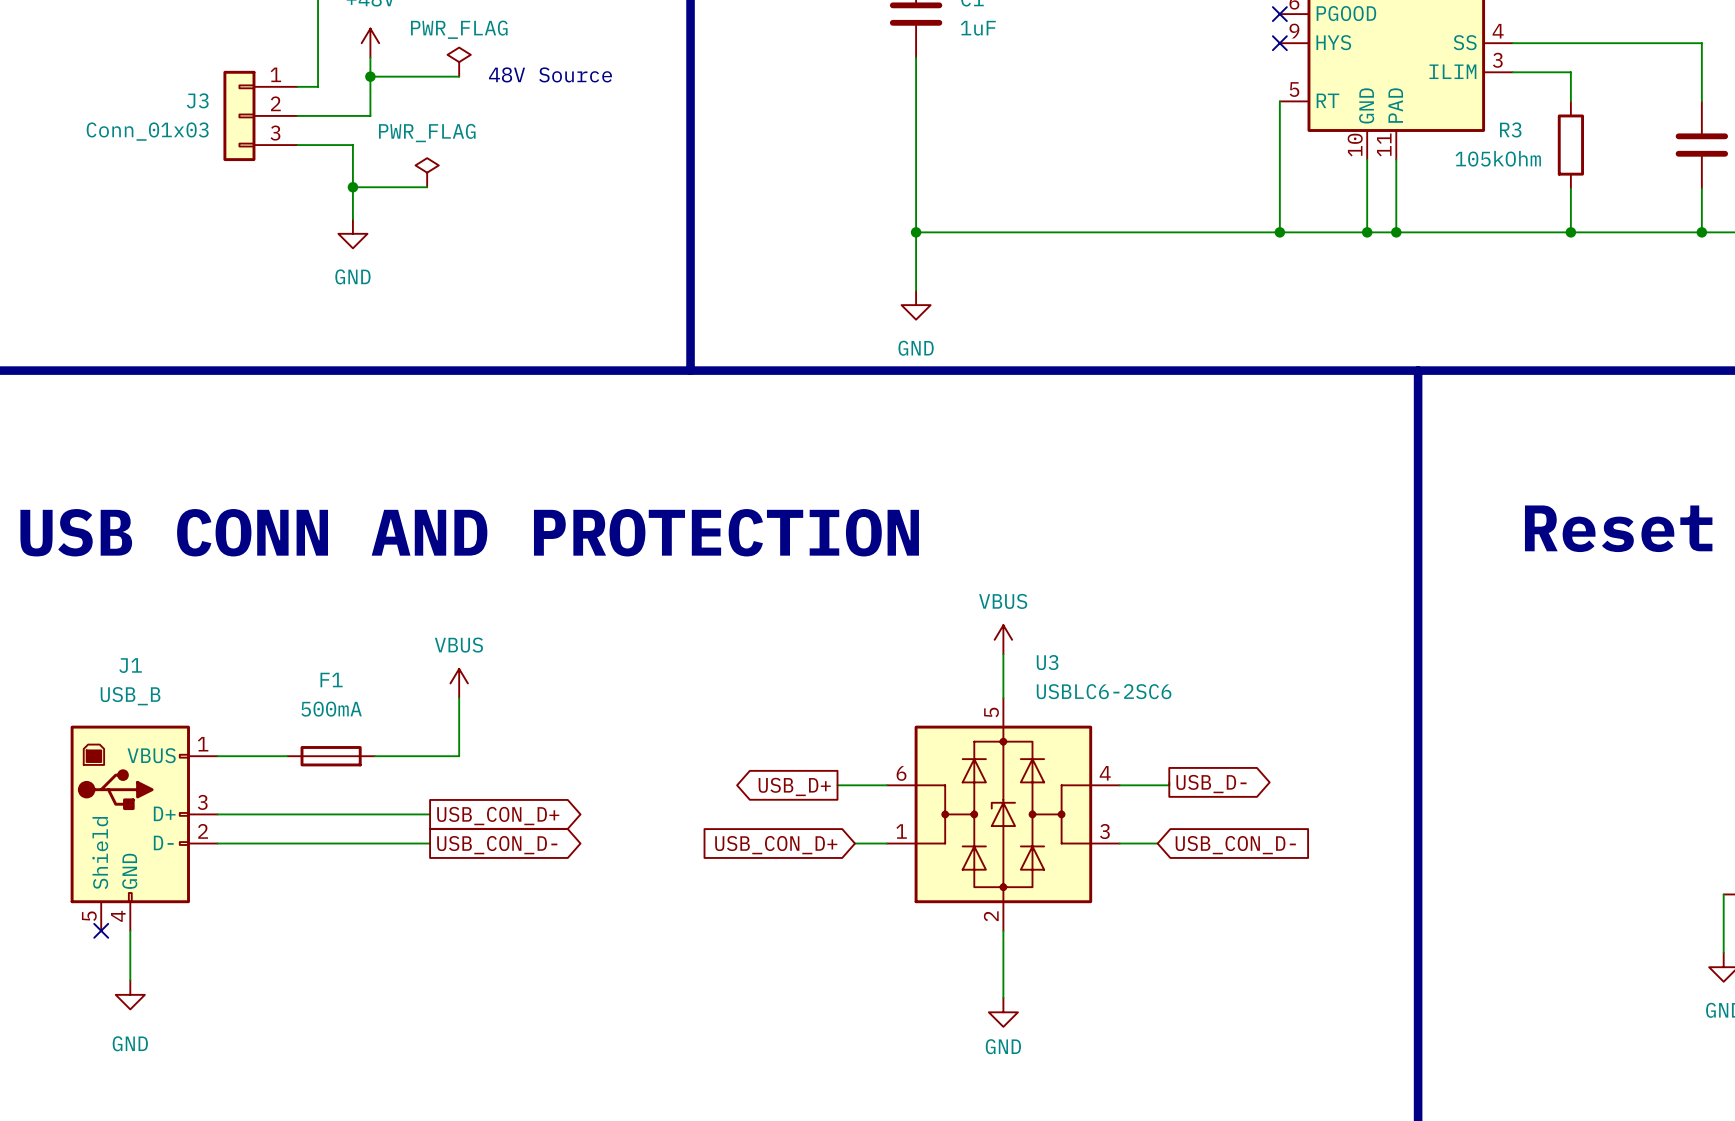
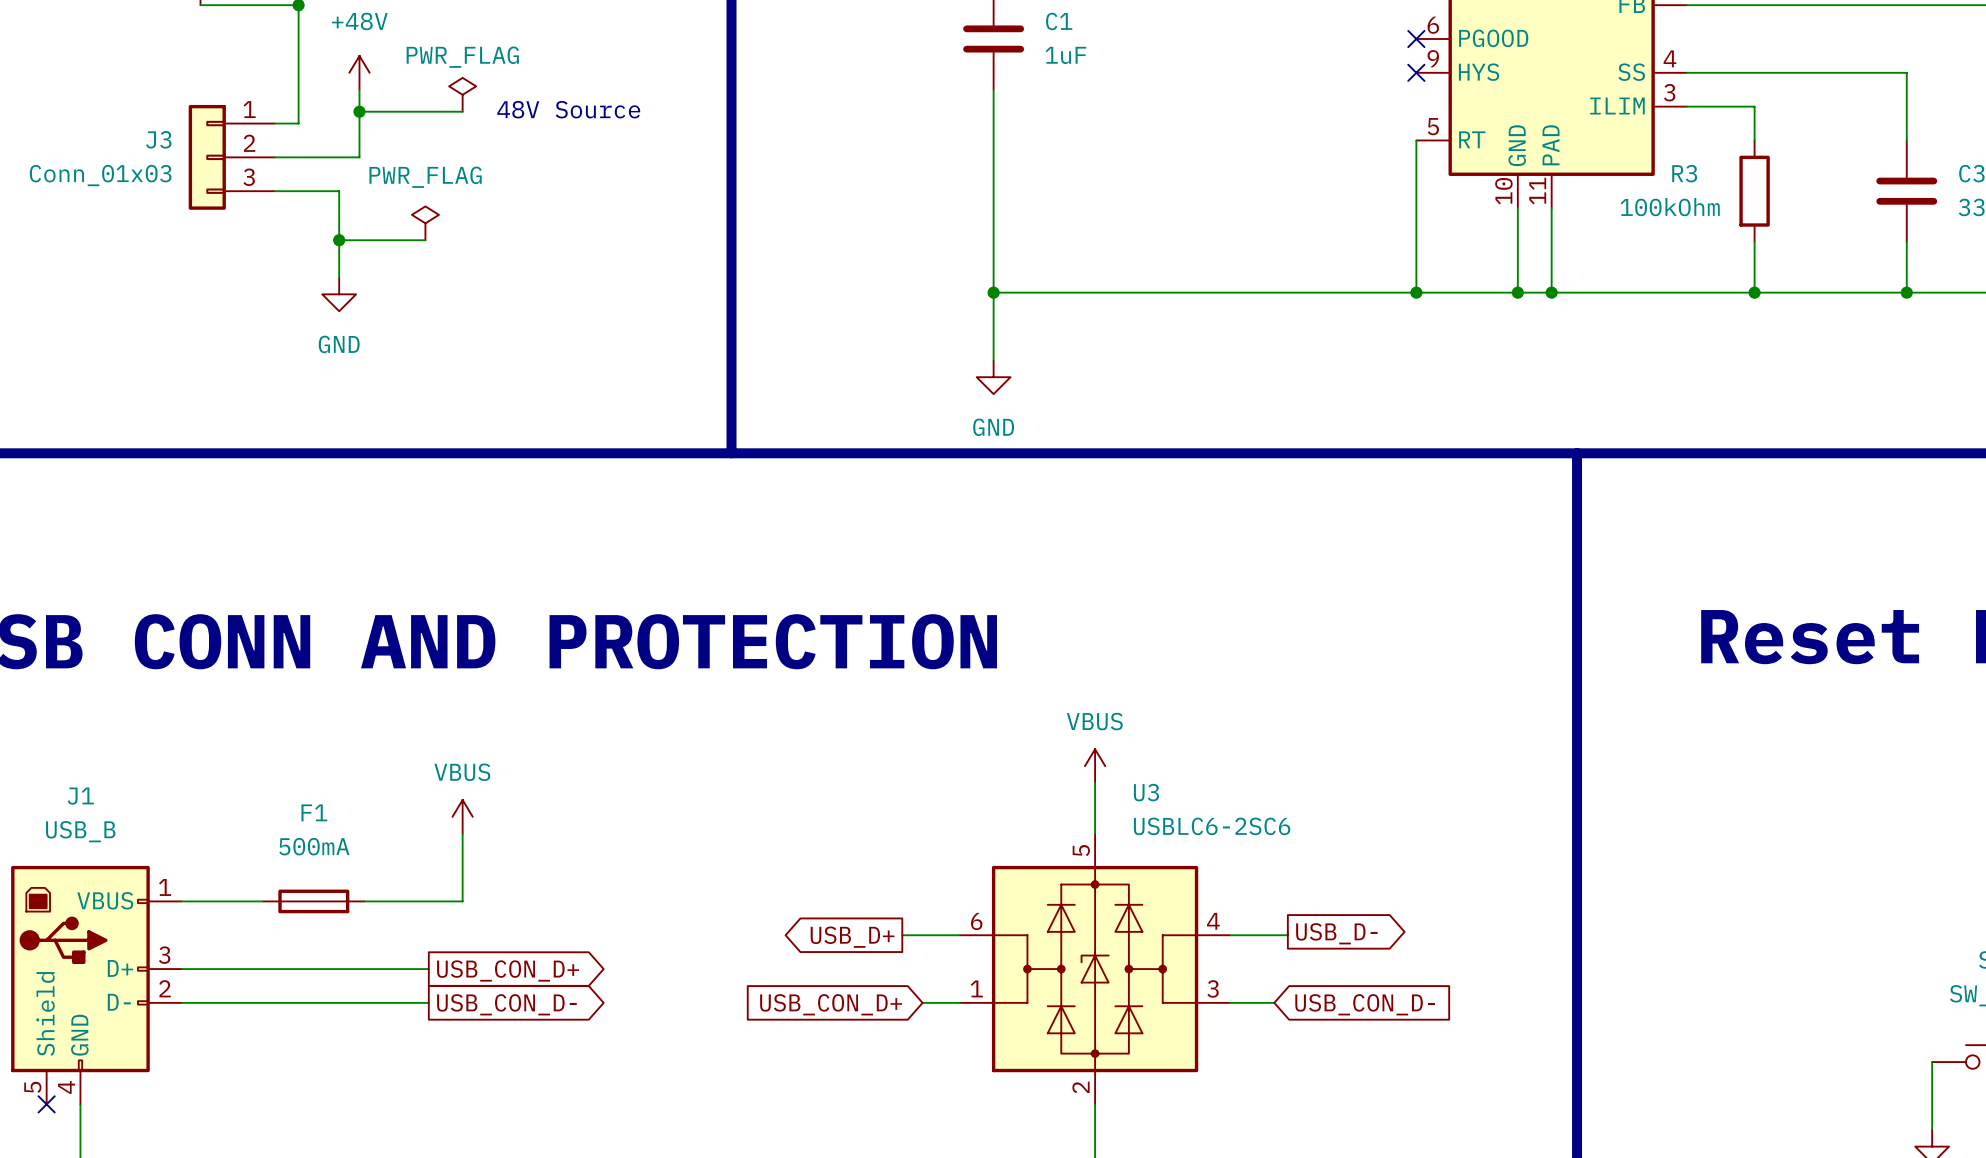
R3 value: 105kOhm (1498, 158) -> 100kOhm (1670, 207)

